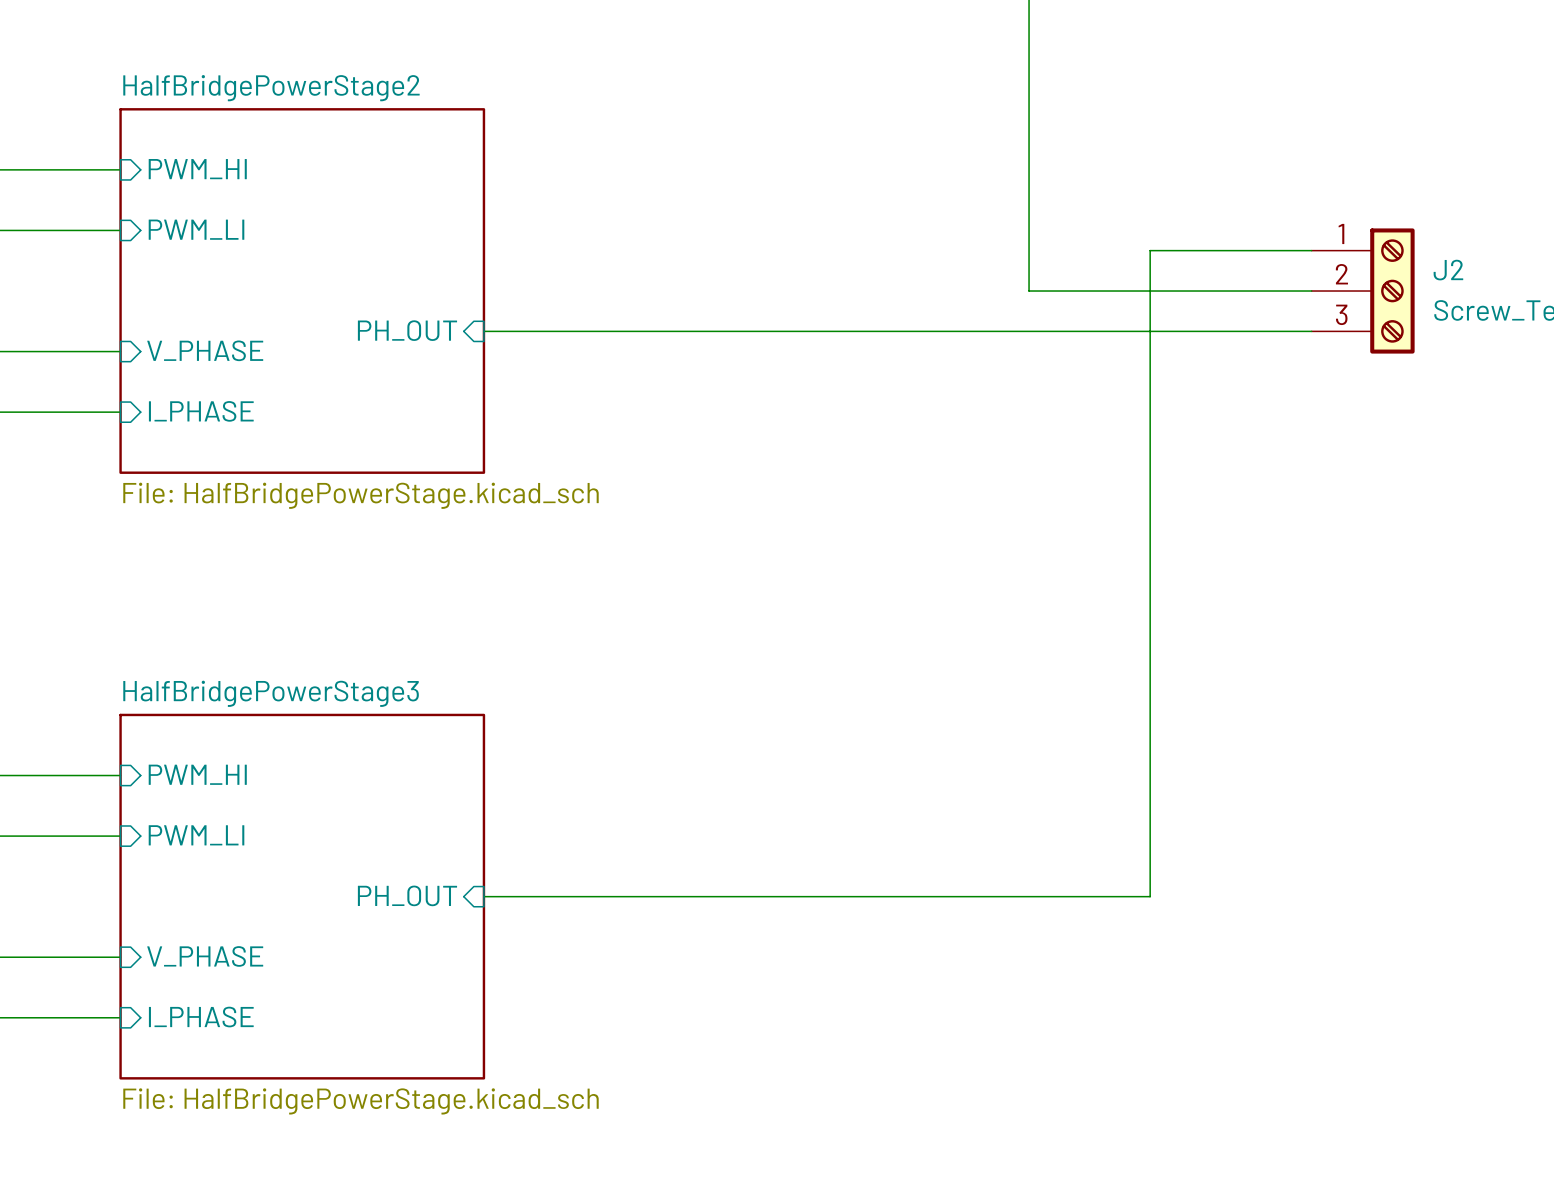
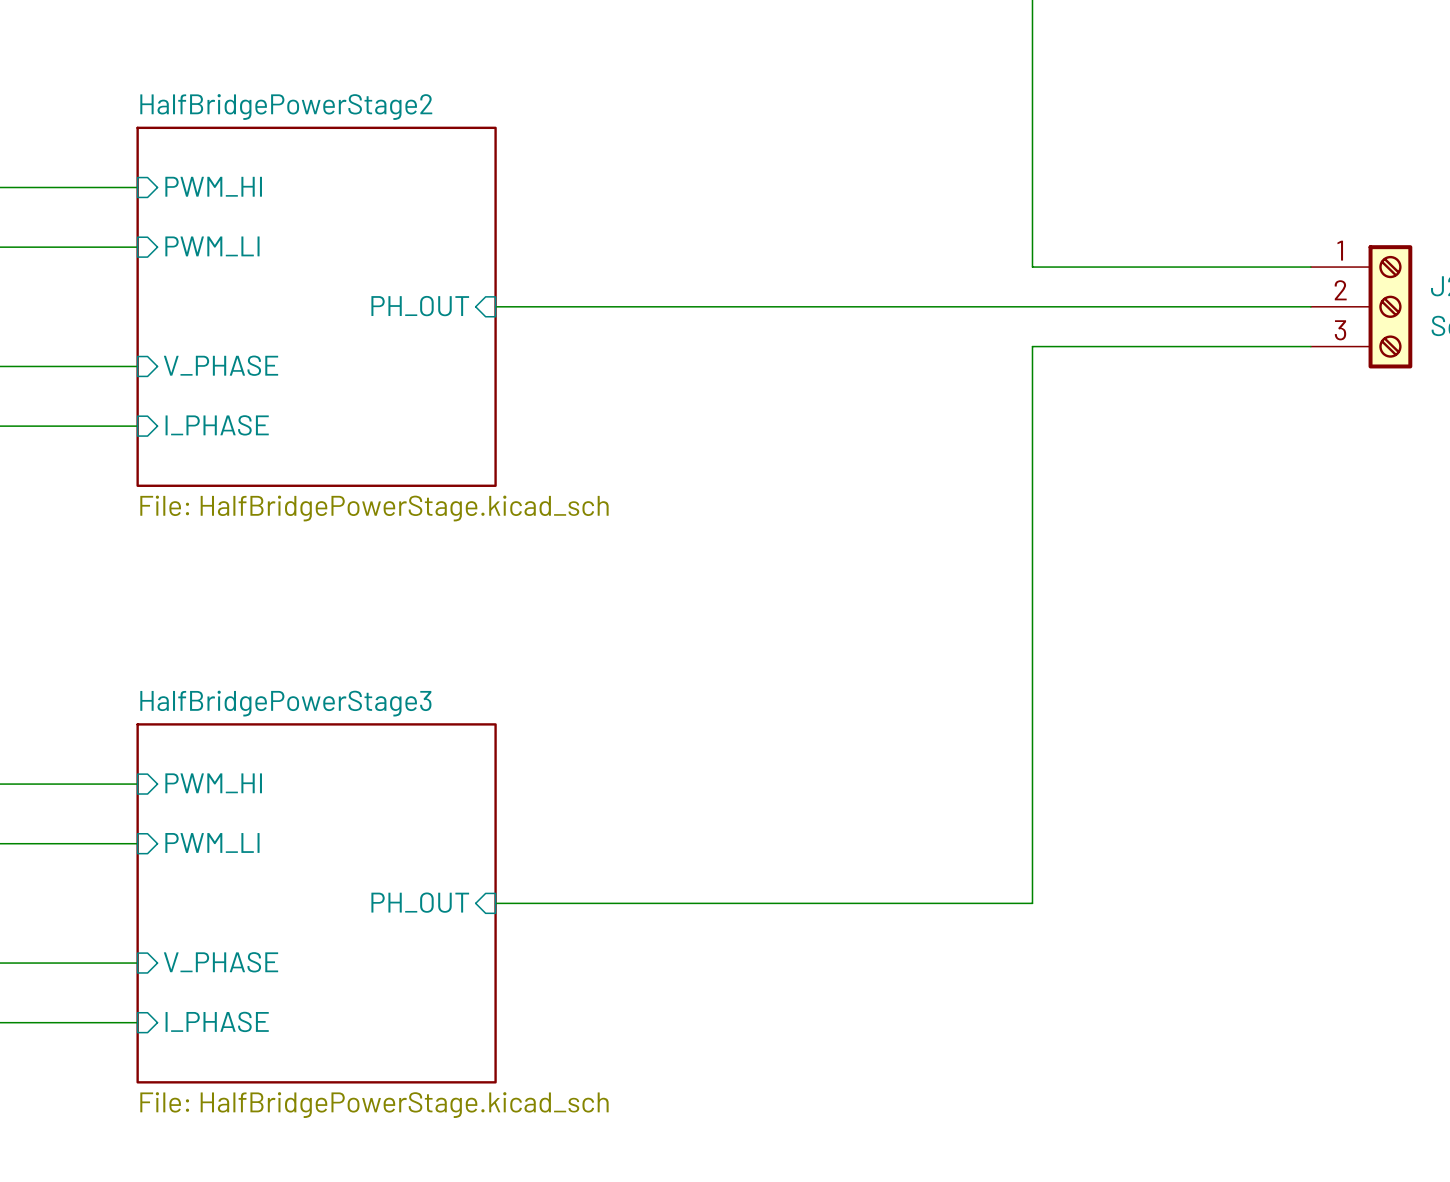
wire: (1029, 250) (1029, 291) -> (1032, 267) (1151, 267)
wire: (1150, 250) (1150, 896) (1029, 896) -> (1032, 346) (1032, 903)
sheet pin position: PH_OUT (407, 330) -> PH_OUT (420, 306)
wire: (483, 331) (1029, 331) -> (495, 306) (1032, 306)

